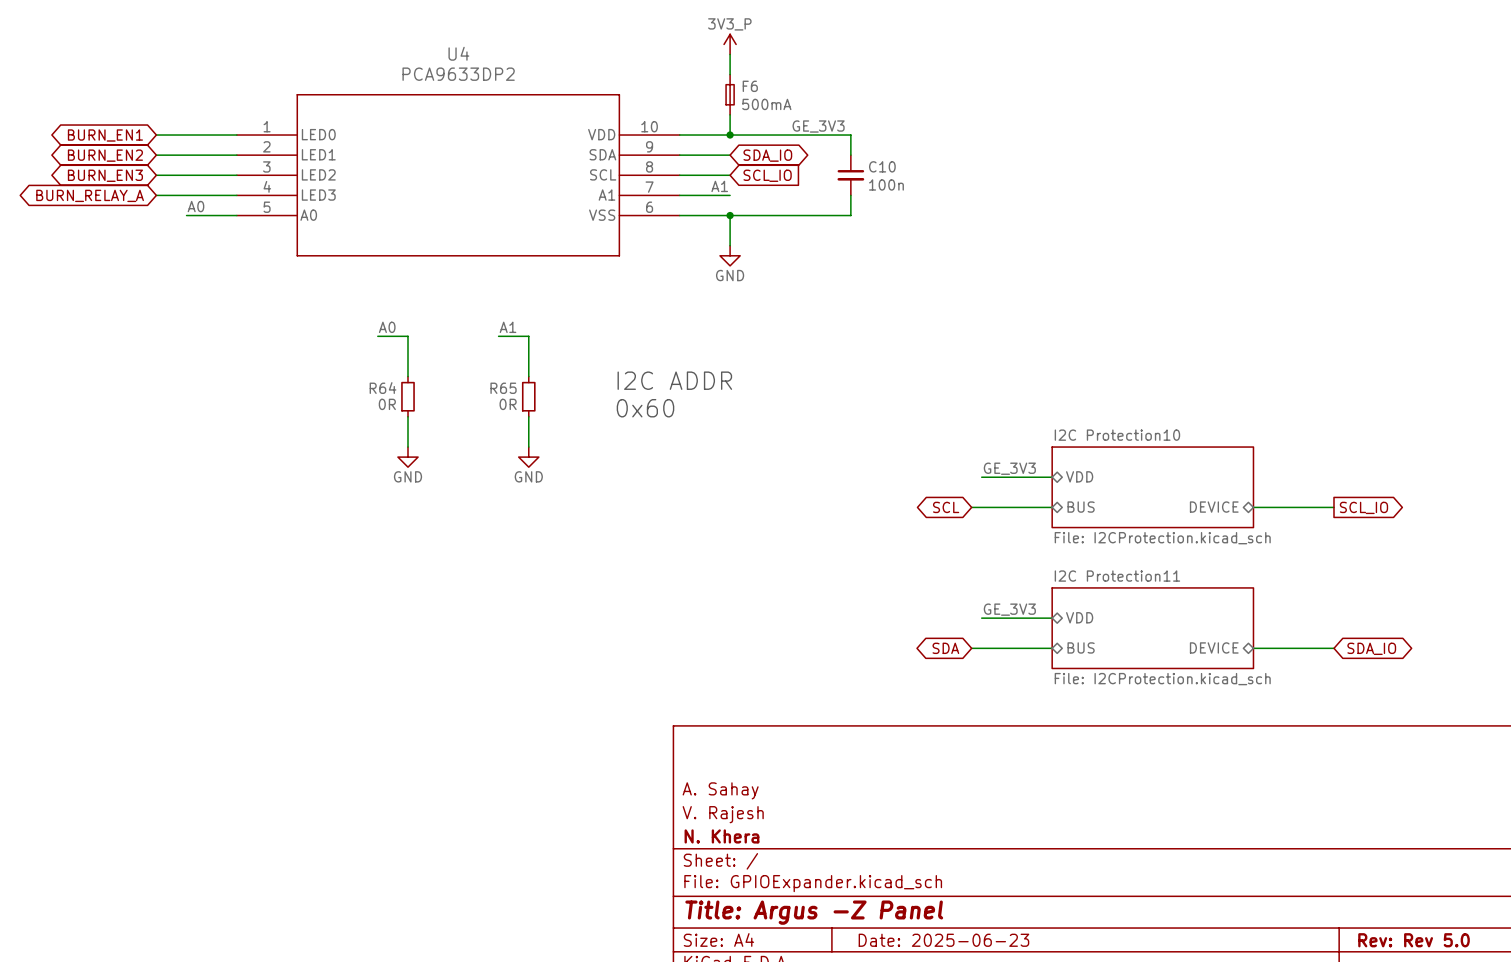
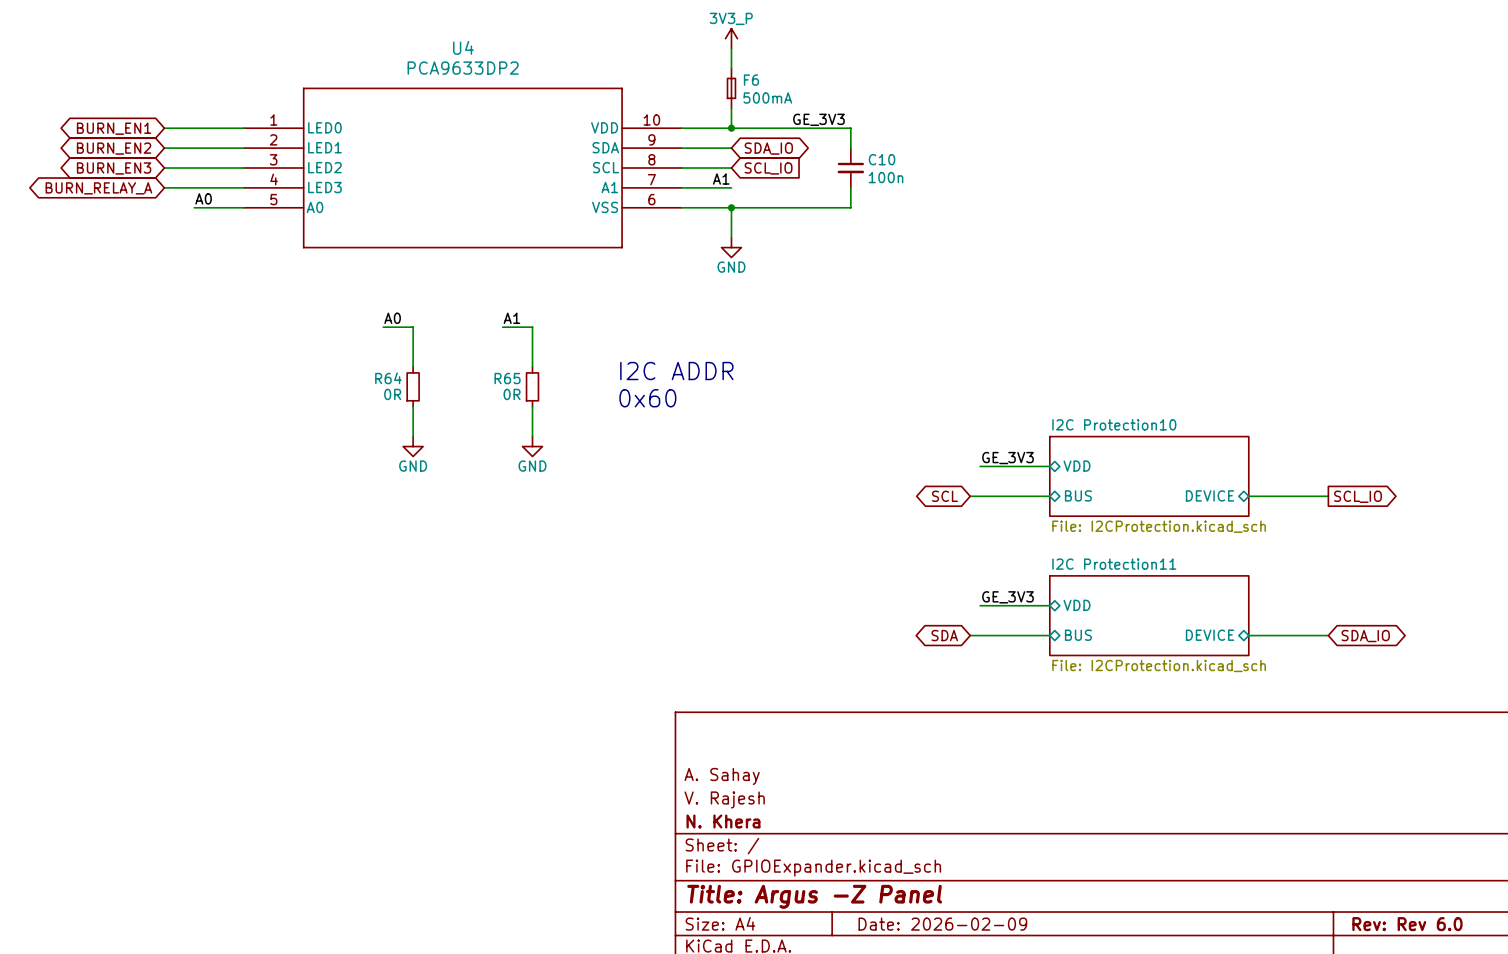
title block: Date: 2025-06-23 (943, 940) -> Date: 2026-02-09 (942, 924)
title block: Rev: Rev 5.0 (1414, 940) -> Rev: Rev 6.0 (1407, 924)

